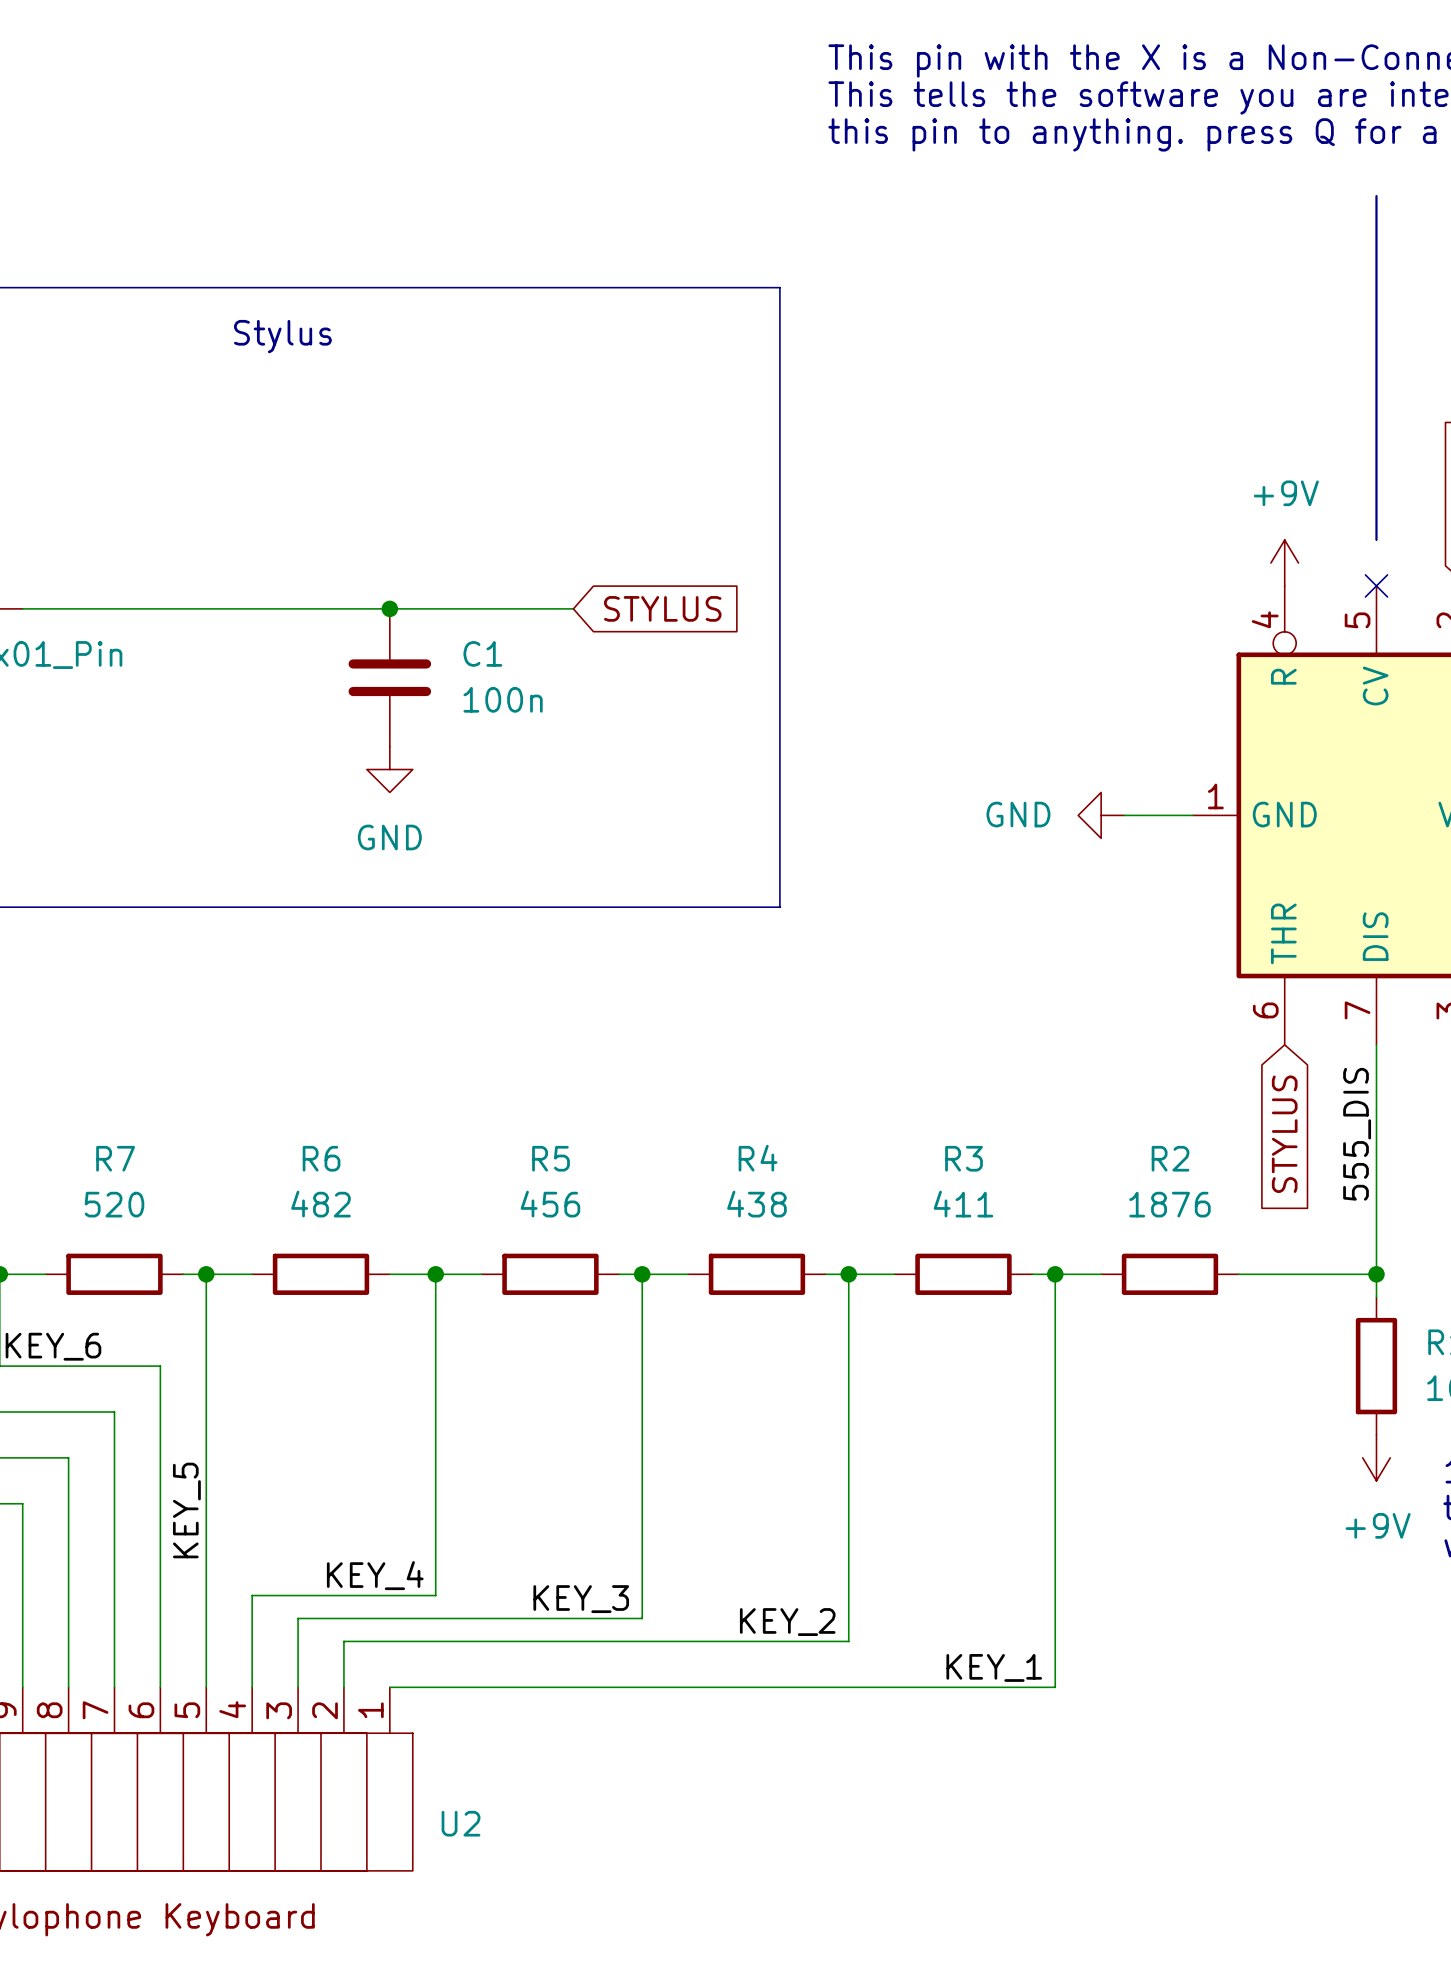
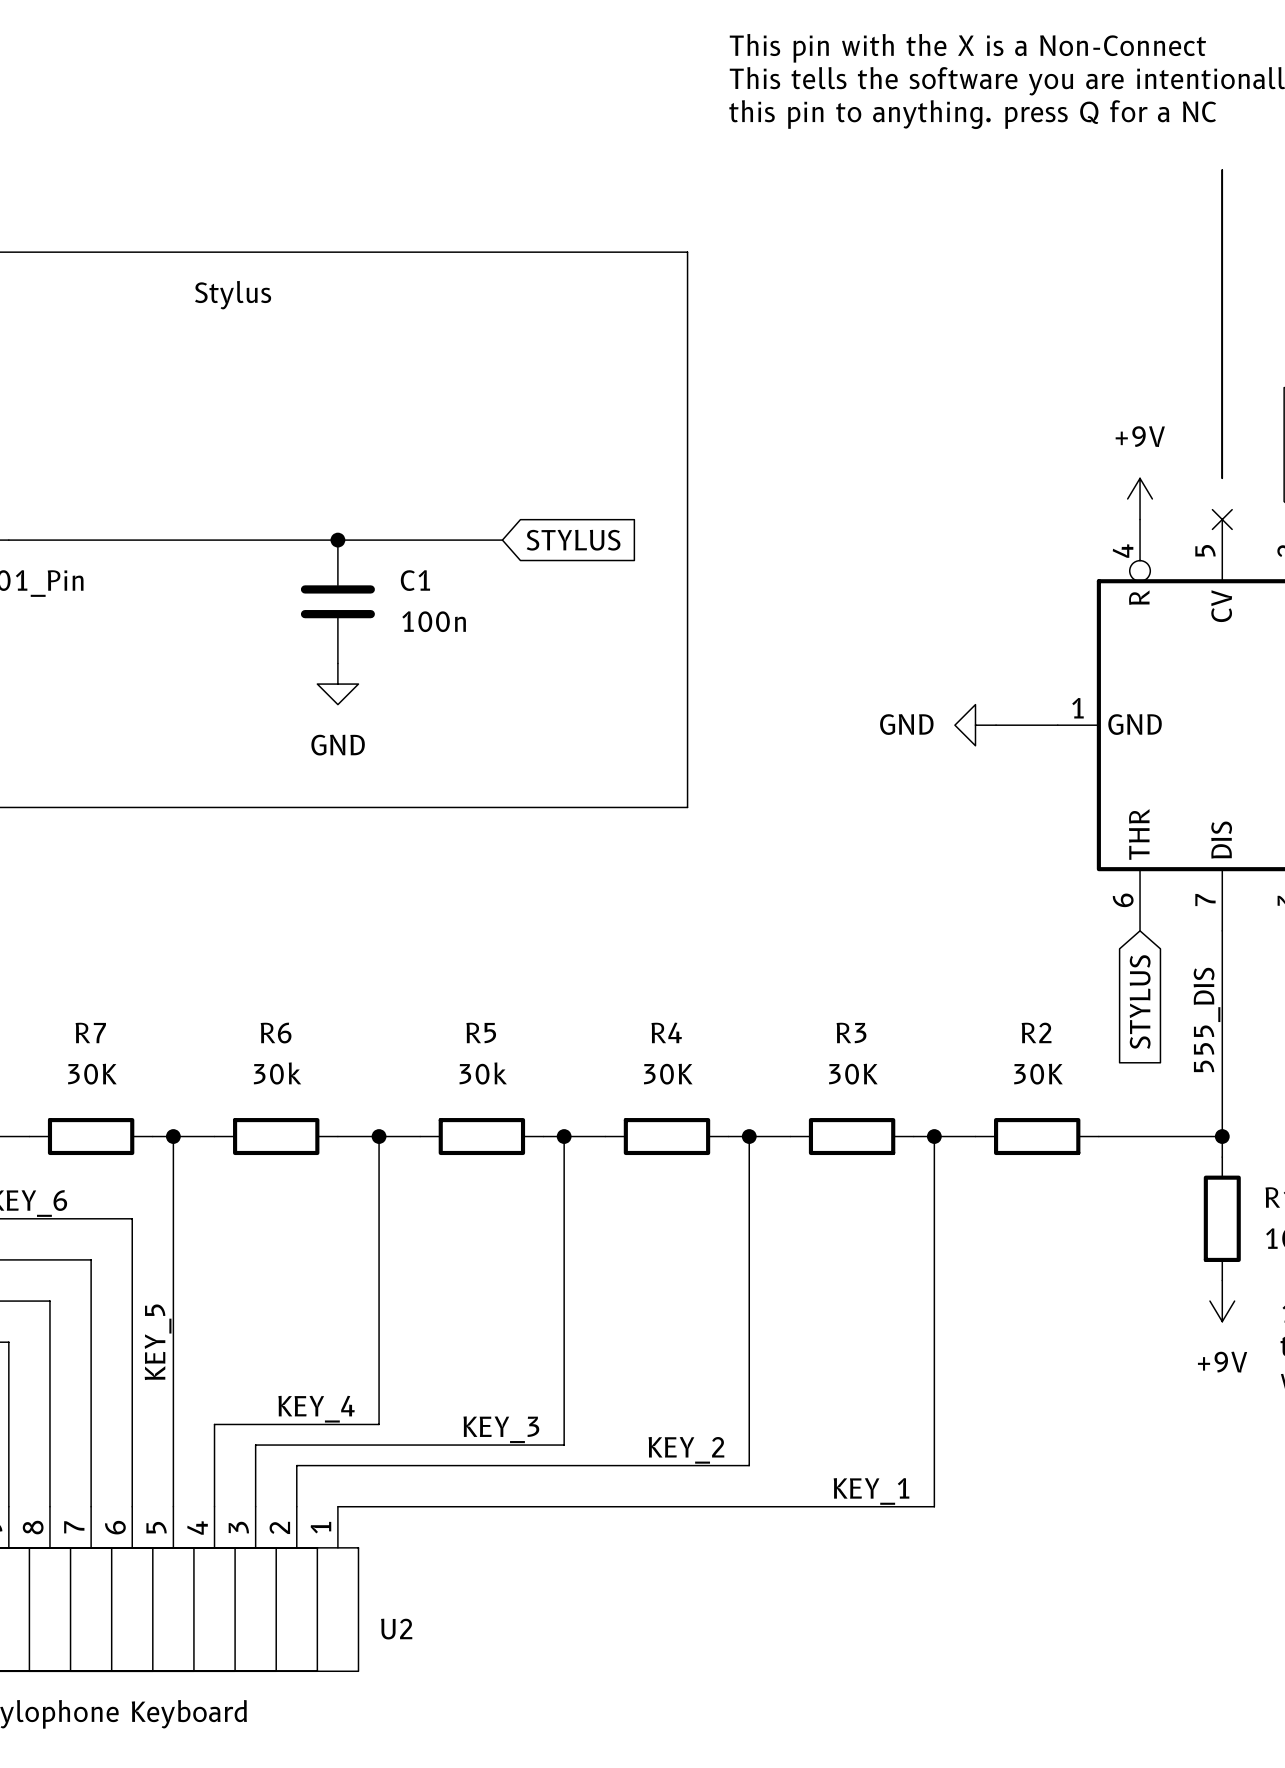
R7 value: 520 (114, 1204) -> 30K (92, 1074)
R6 value: 482 (321, 1204) -> 30k (277, 1073)
R5 value: 456 (550, 1204) -> 30k (483, 1073)
R4 value: 438 (756, 1204) -> 30K (668, 1074)
R3 value: 411 (963, 1204) -> 30K (853, 1074)
R2 value: 1876 (1169, 1204) -> 30K (1038, 1074)

